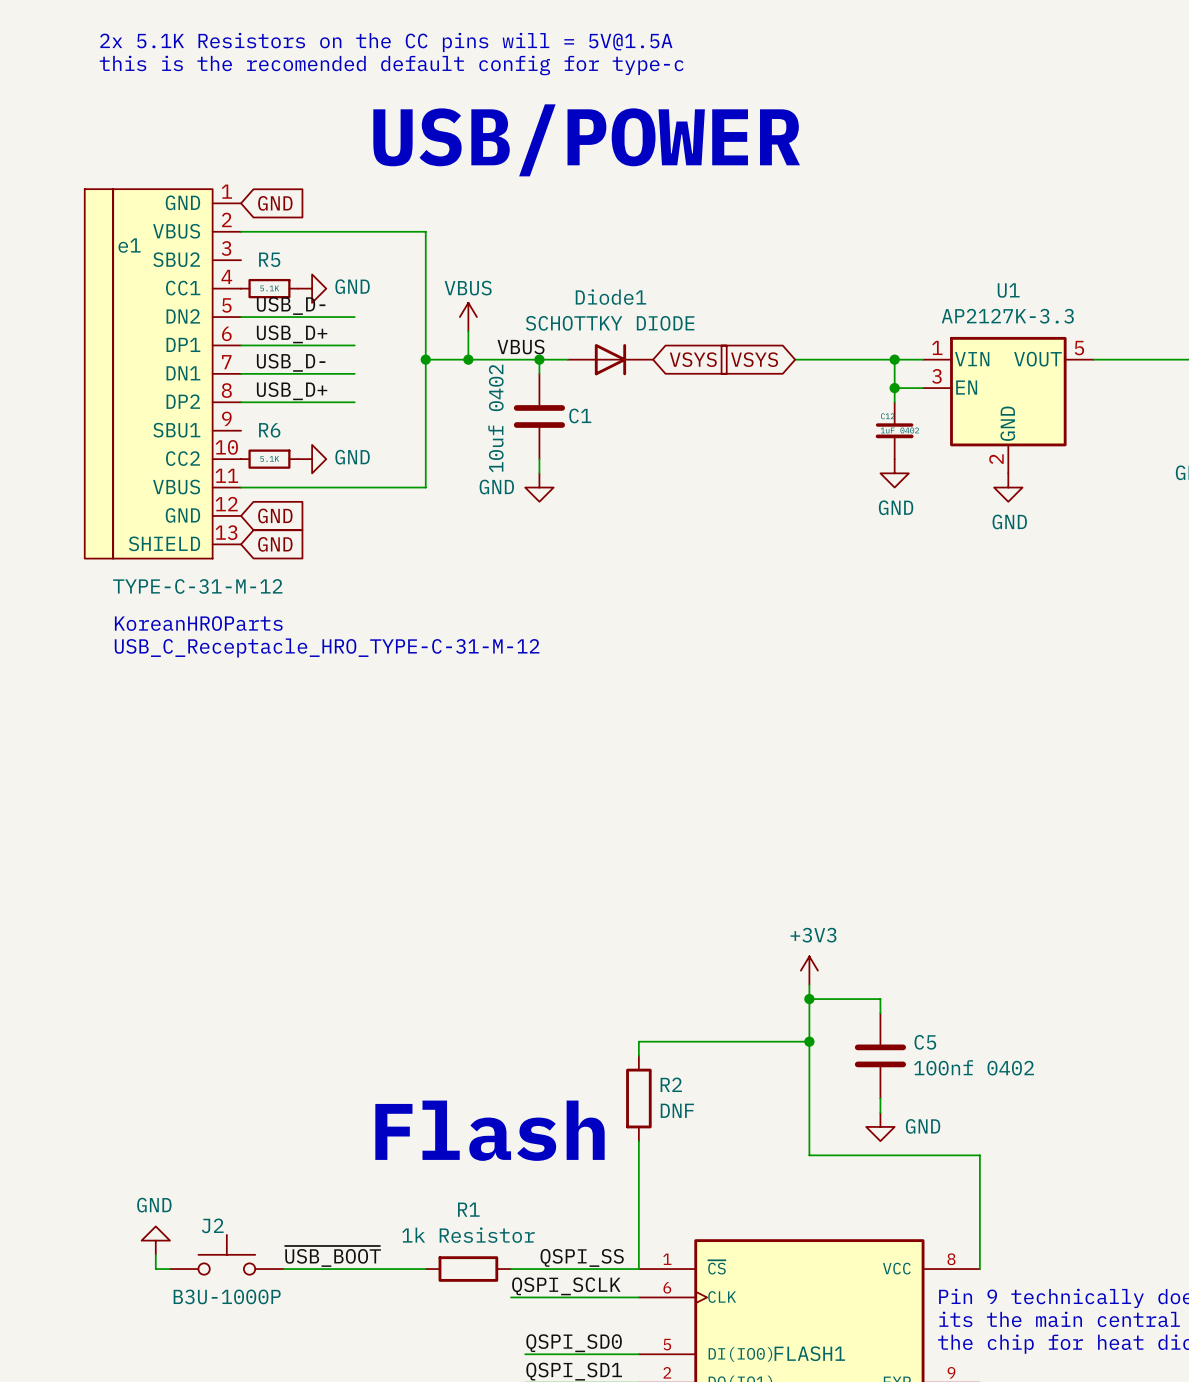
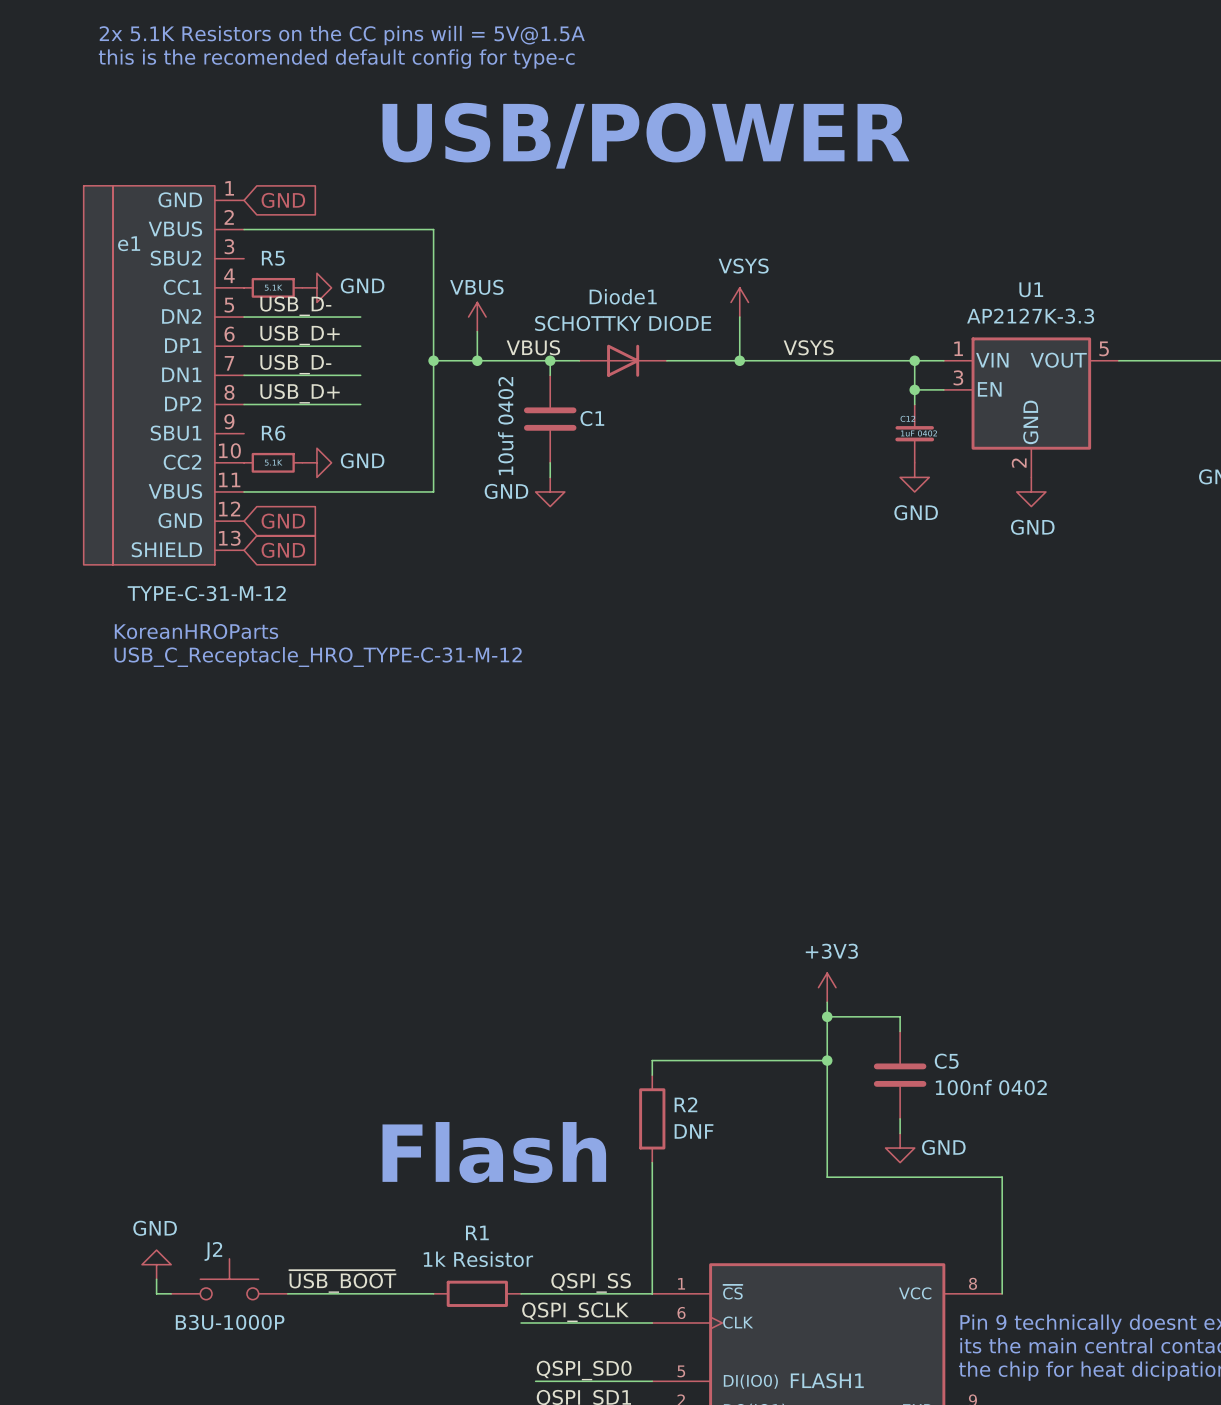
power symbol: none -> VSYS (739, 302)
wire: none -> (739, 317) (739, 360)
label: none -> VSYS (808, 347)
wire: none -> (666, 360) (812, 360)
global label: VSYS (693, 359) -> none
junction: none -> (739, 360)
global label: VSYS (754, 359) -> none

